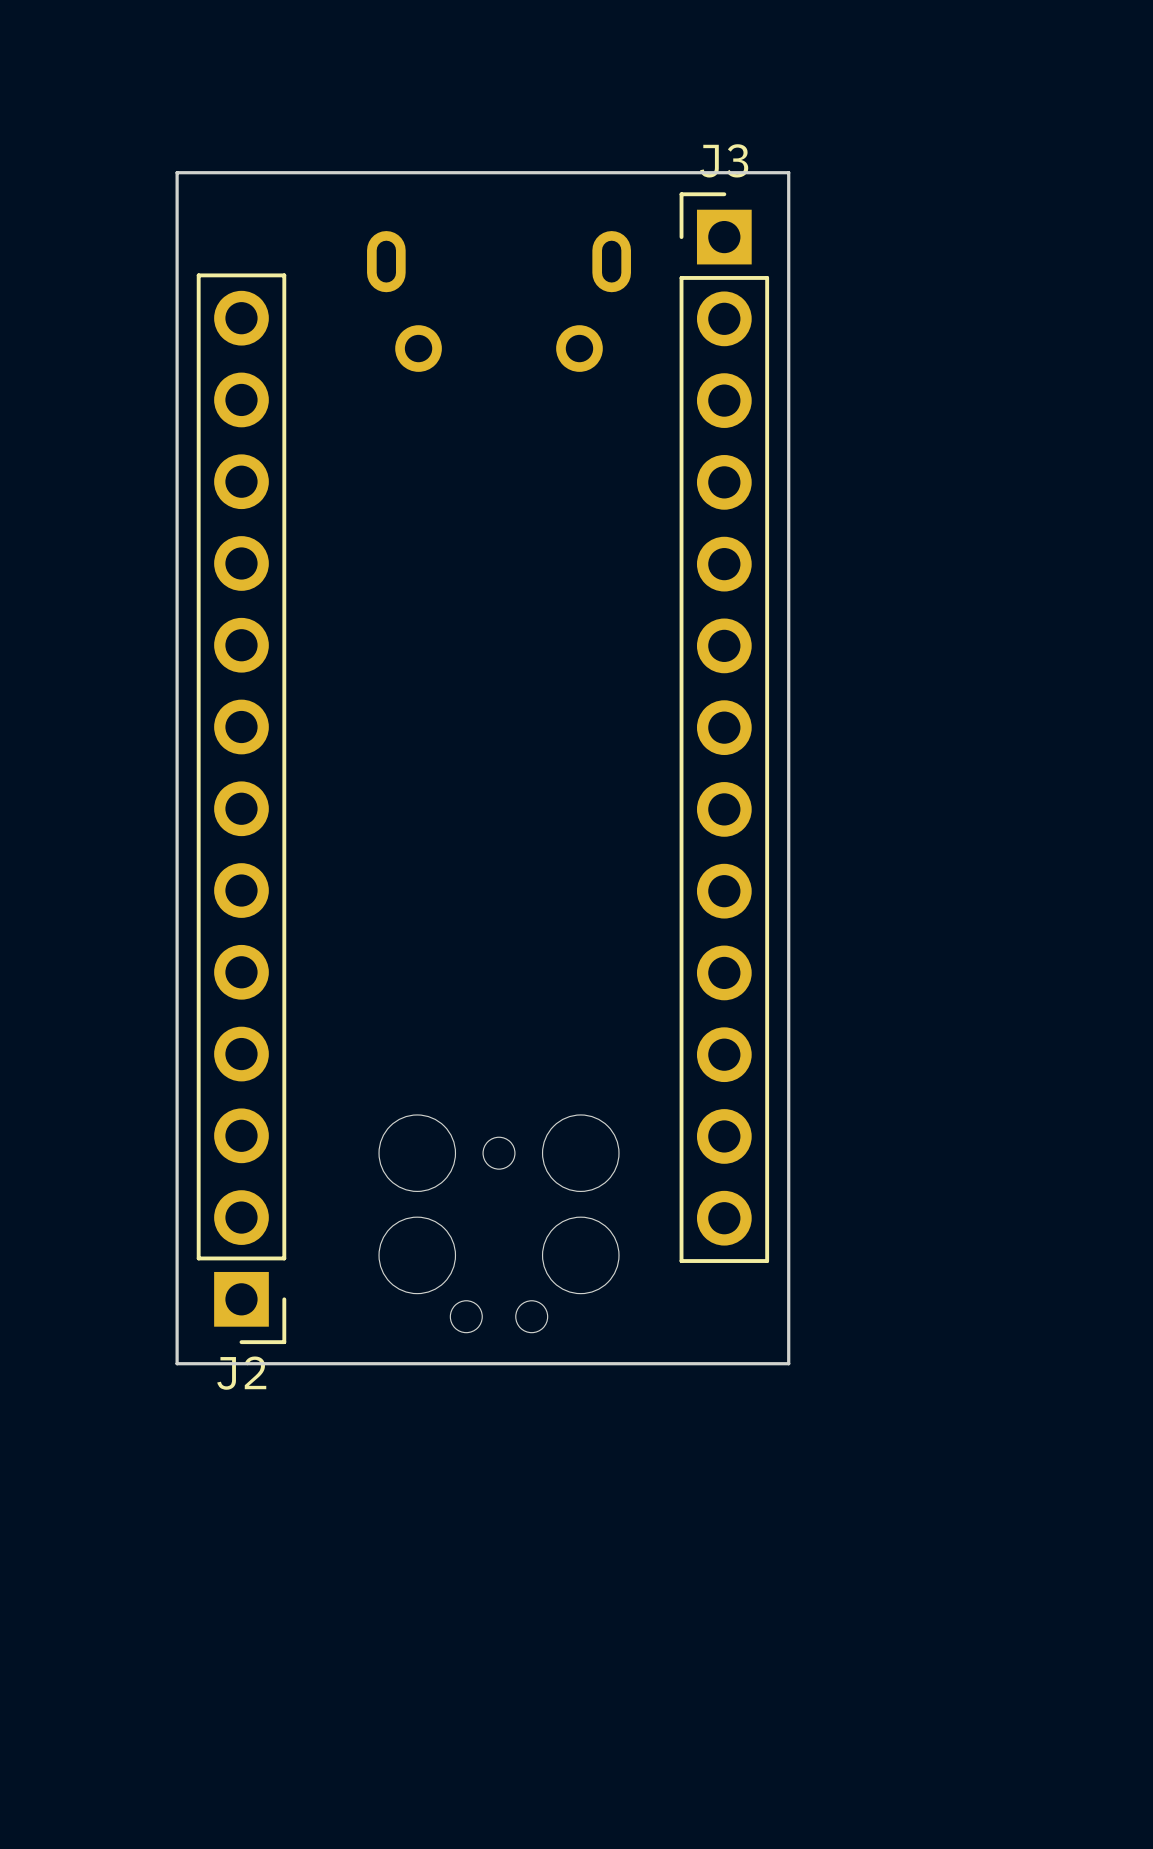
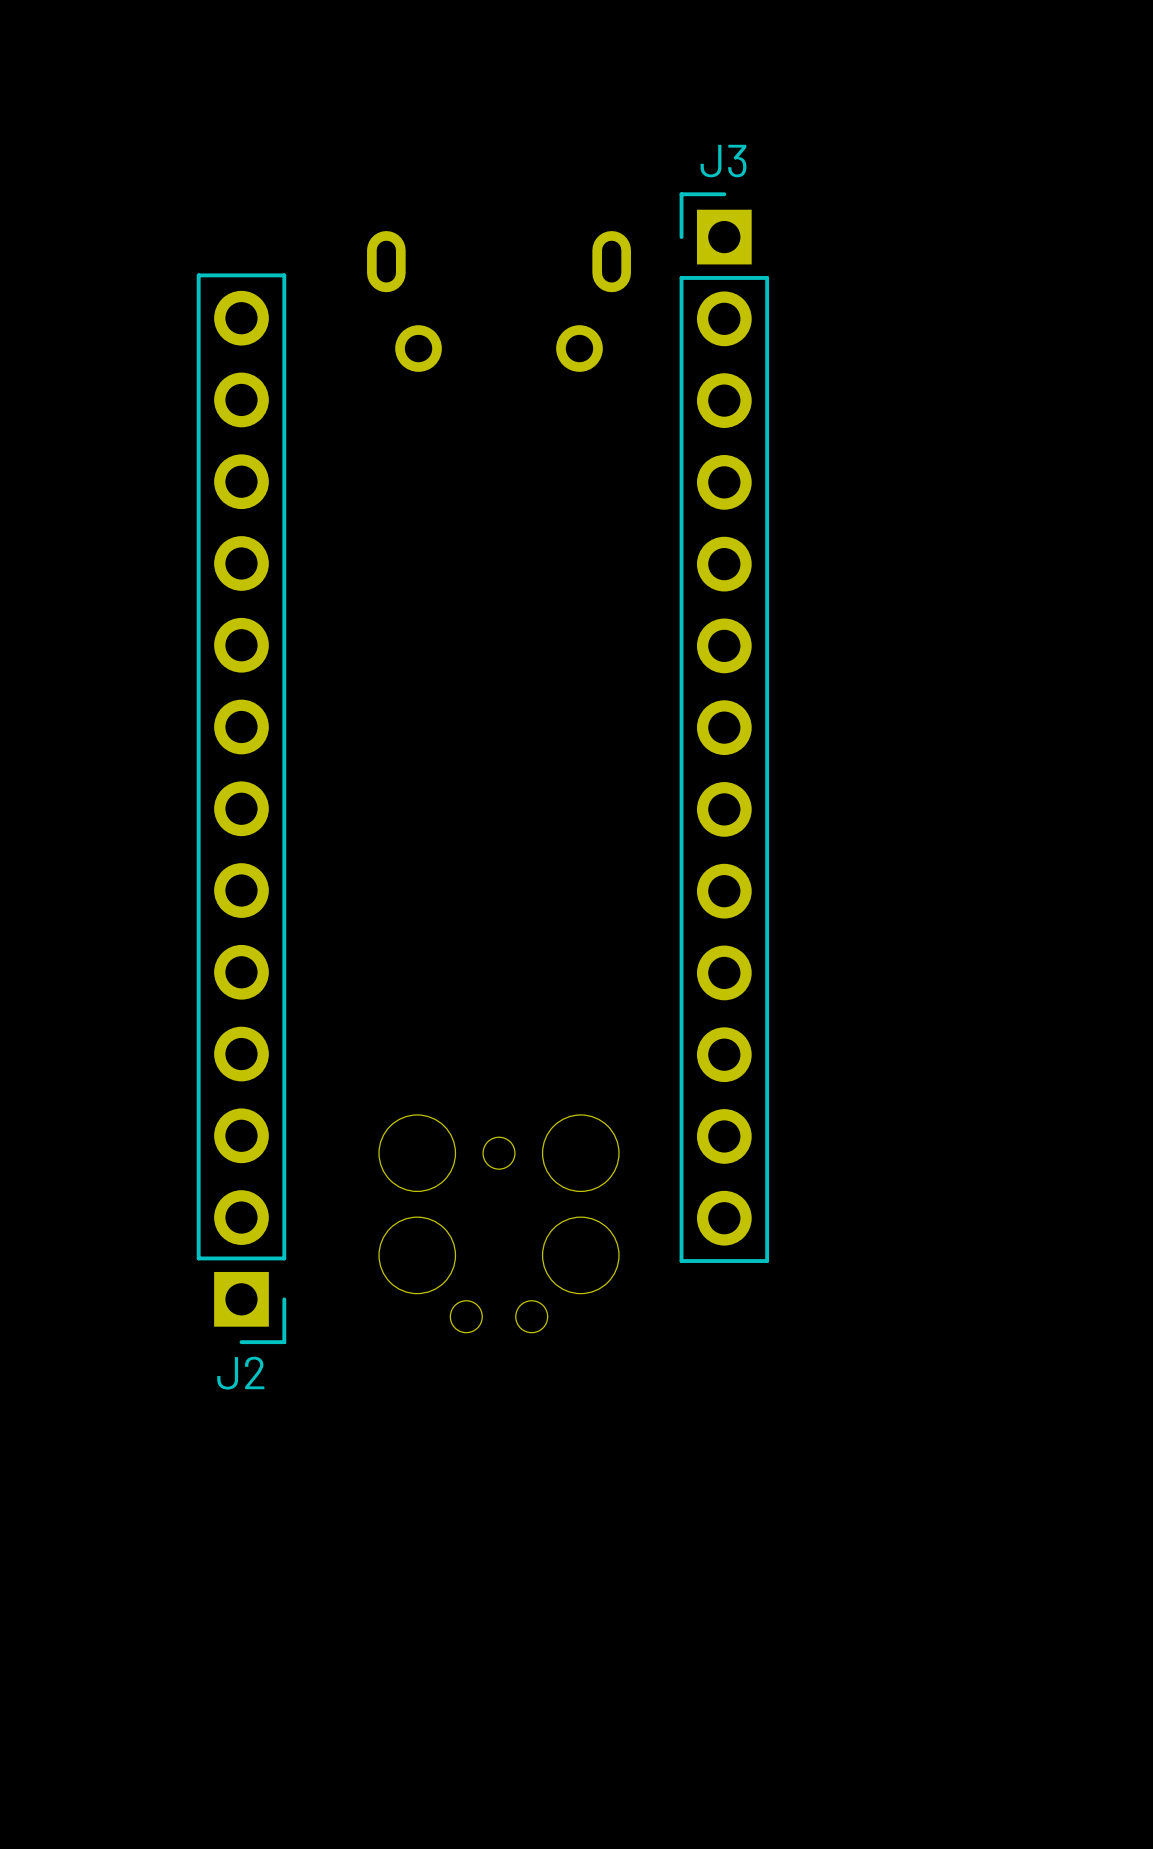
board edge: (788, 172) (177, 172) (177, 1363) (788, 1363) (788, 172) -> none

